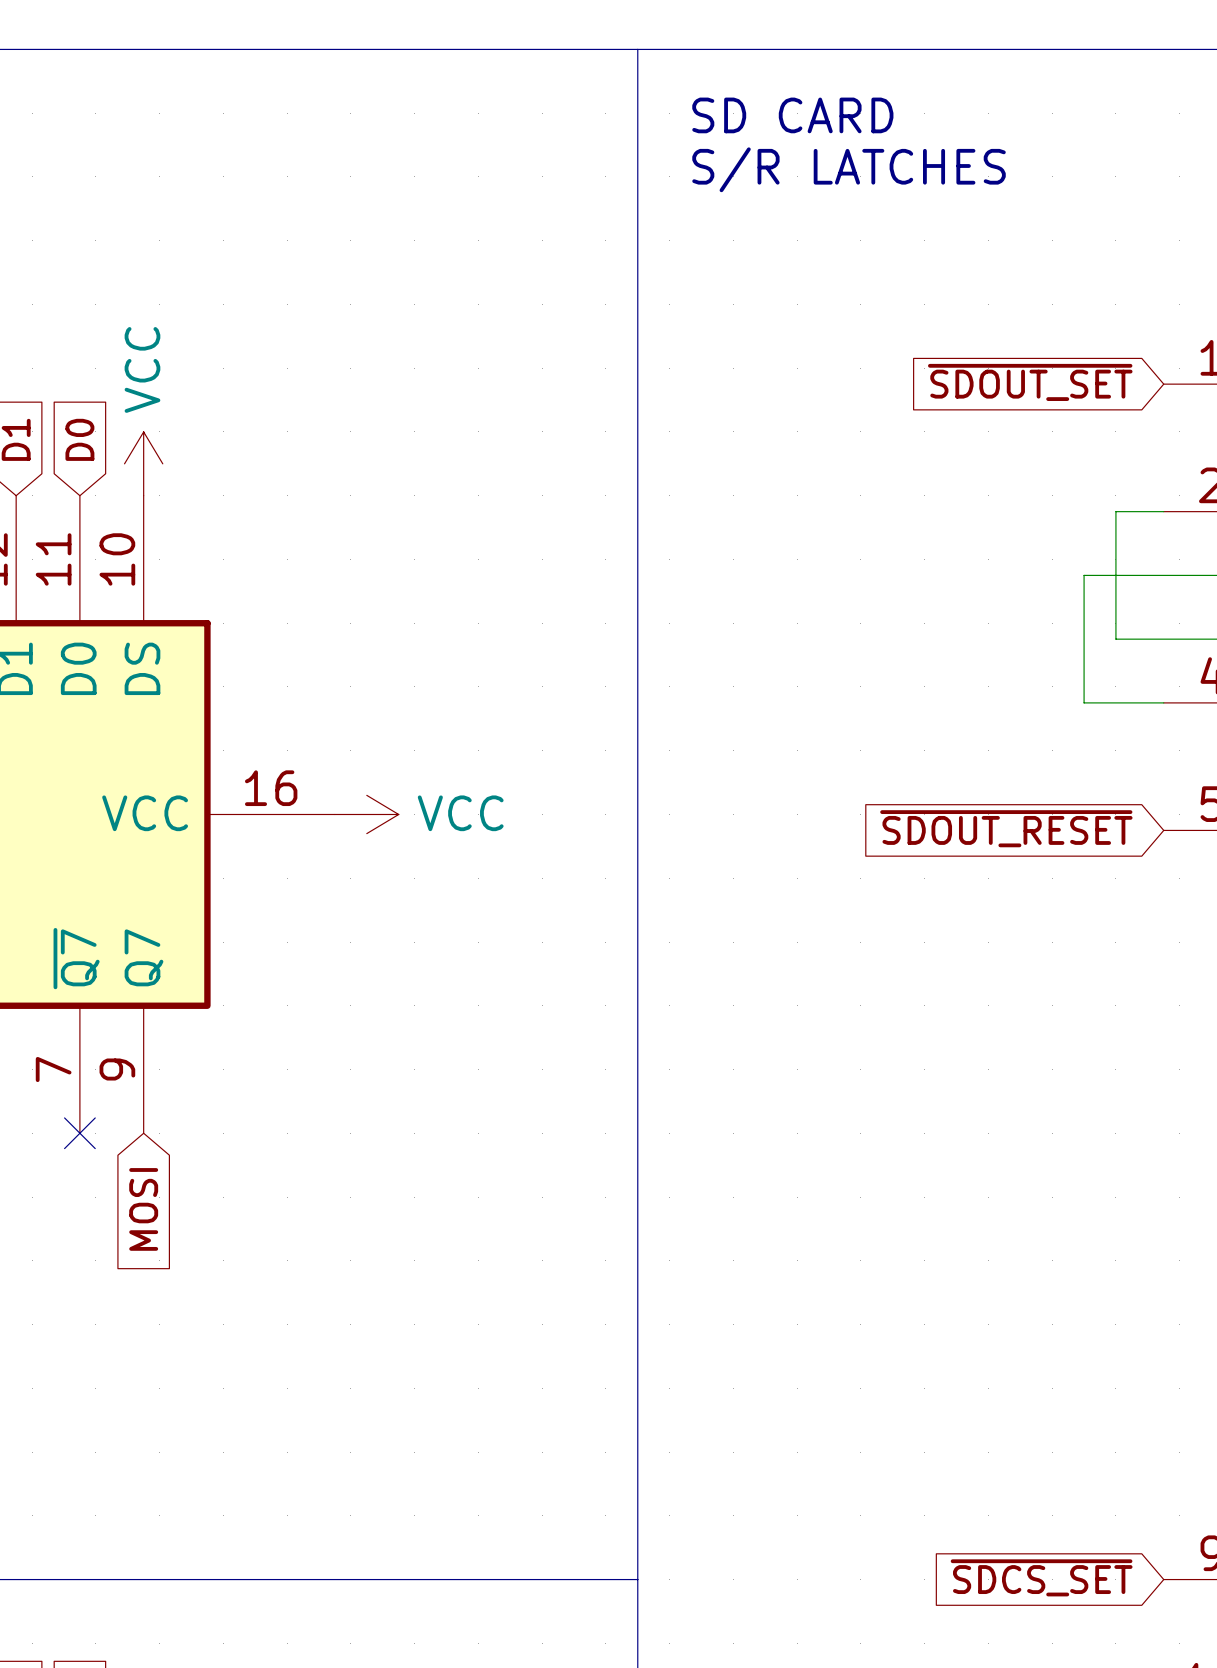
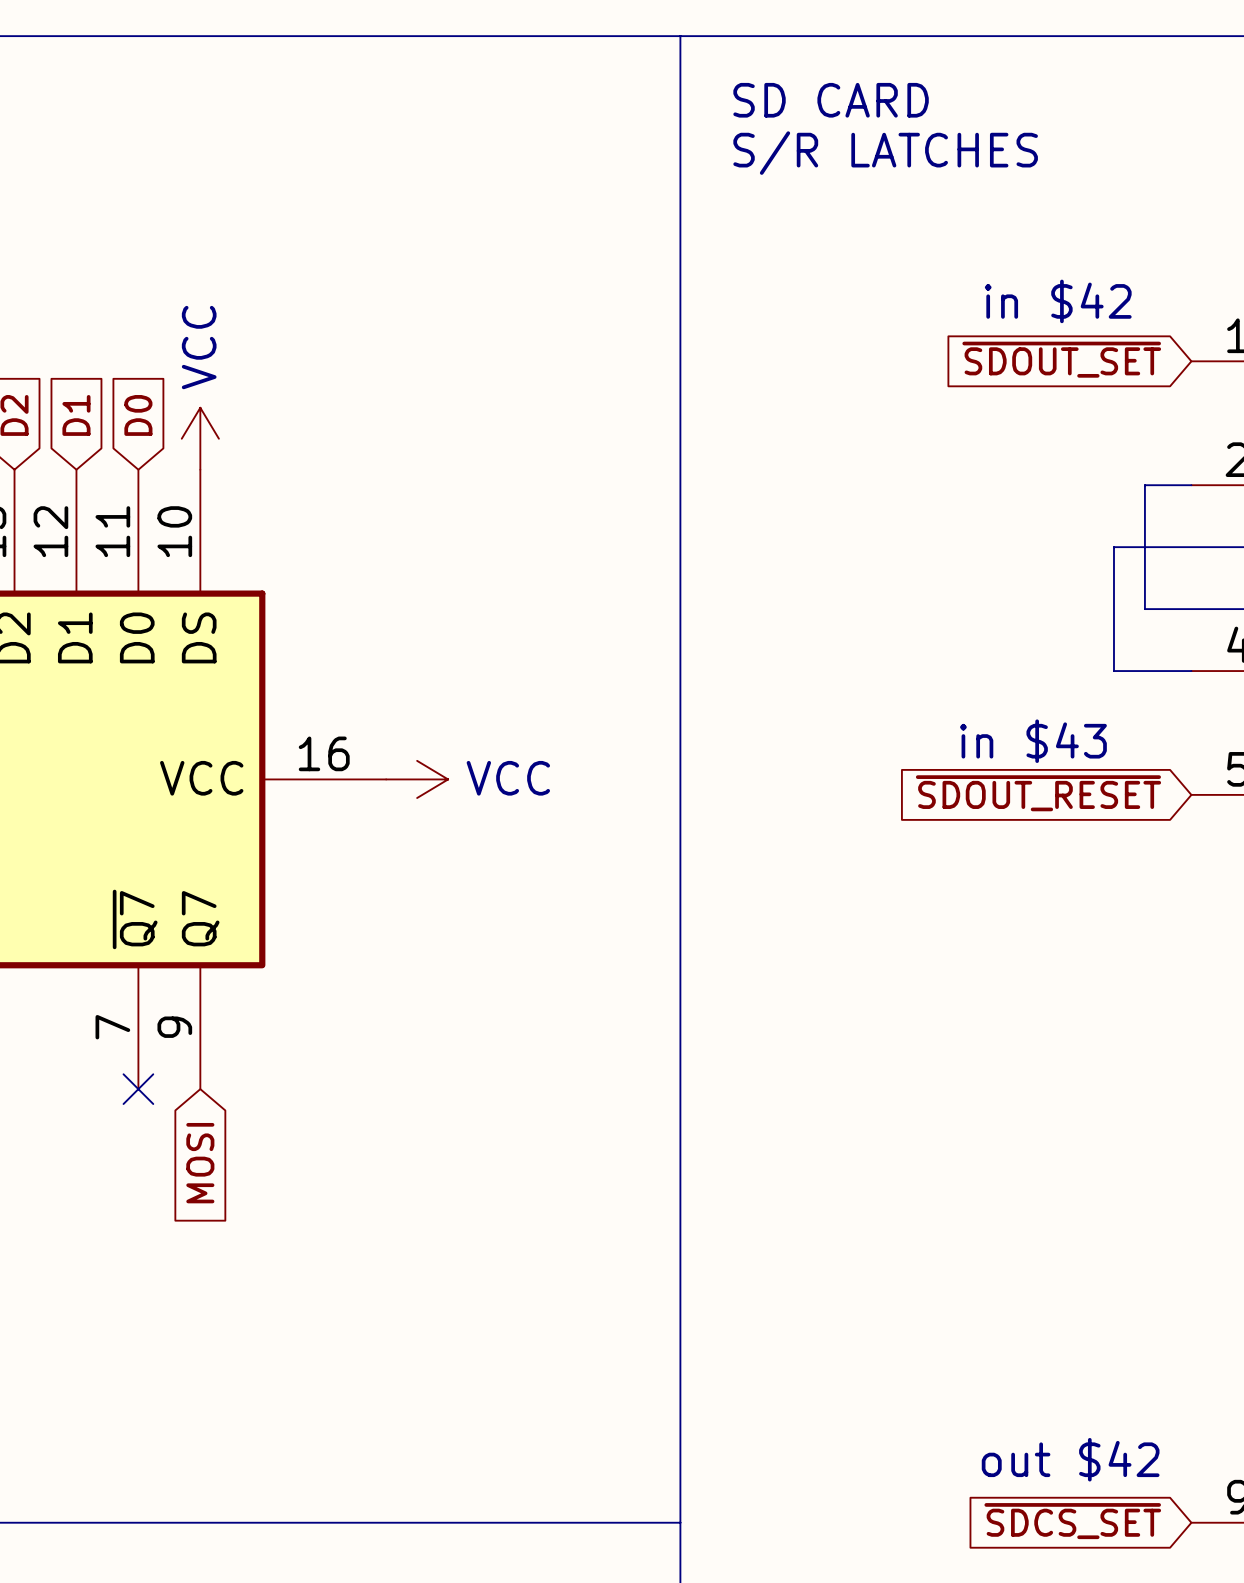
text: none -> in $42 (1058, 301)
text: none -> in $43 (1033, 741)
text: none -> out $42 (1070, 1459)

